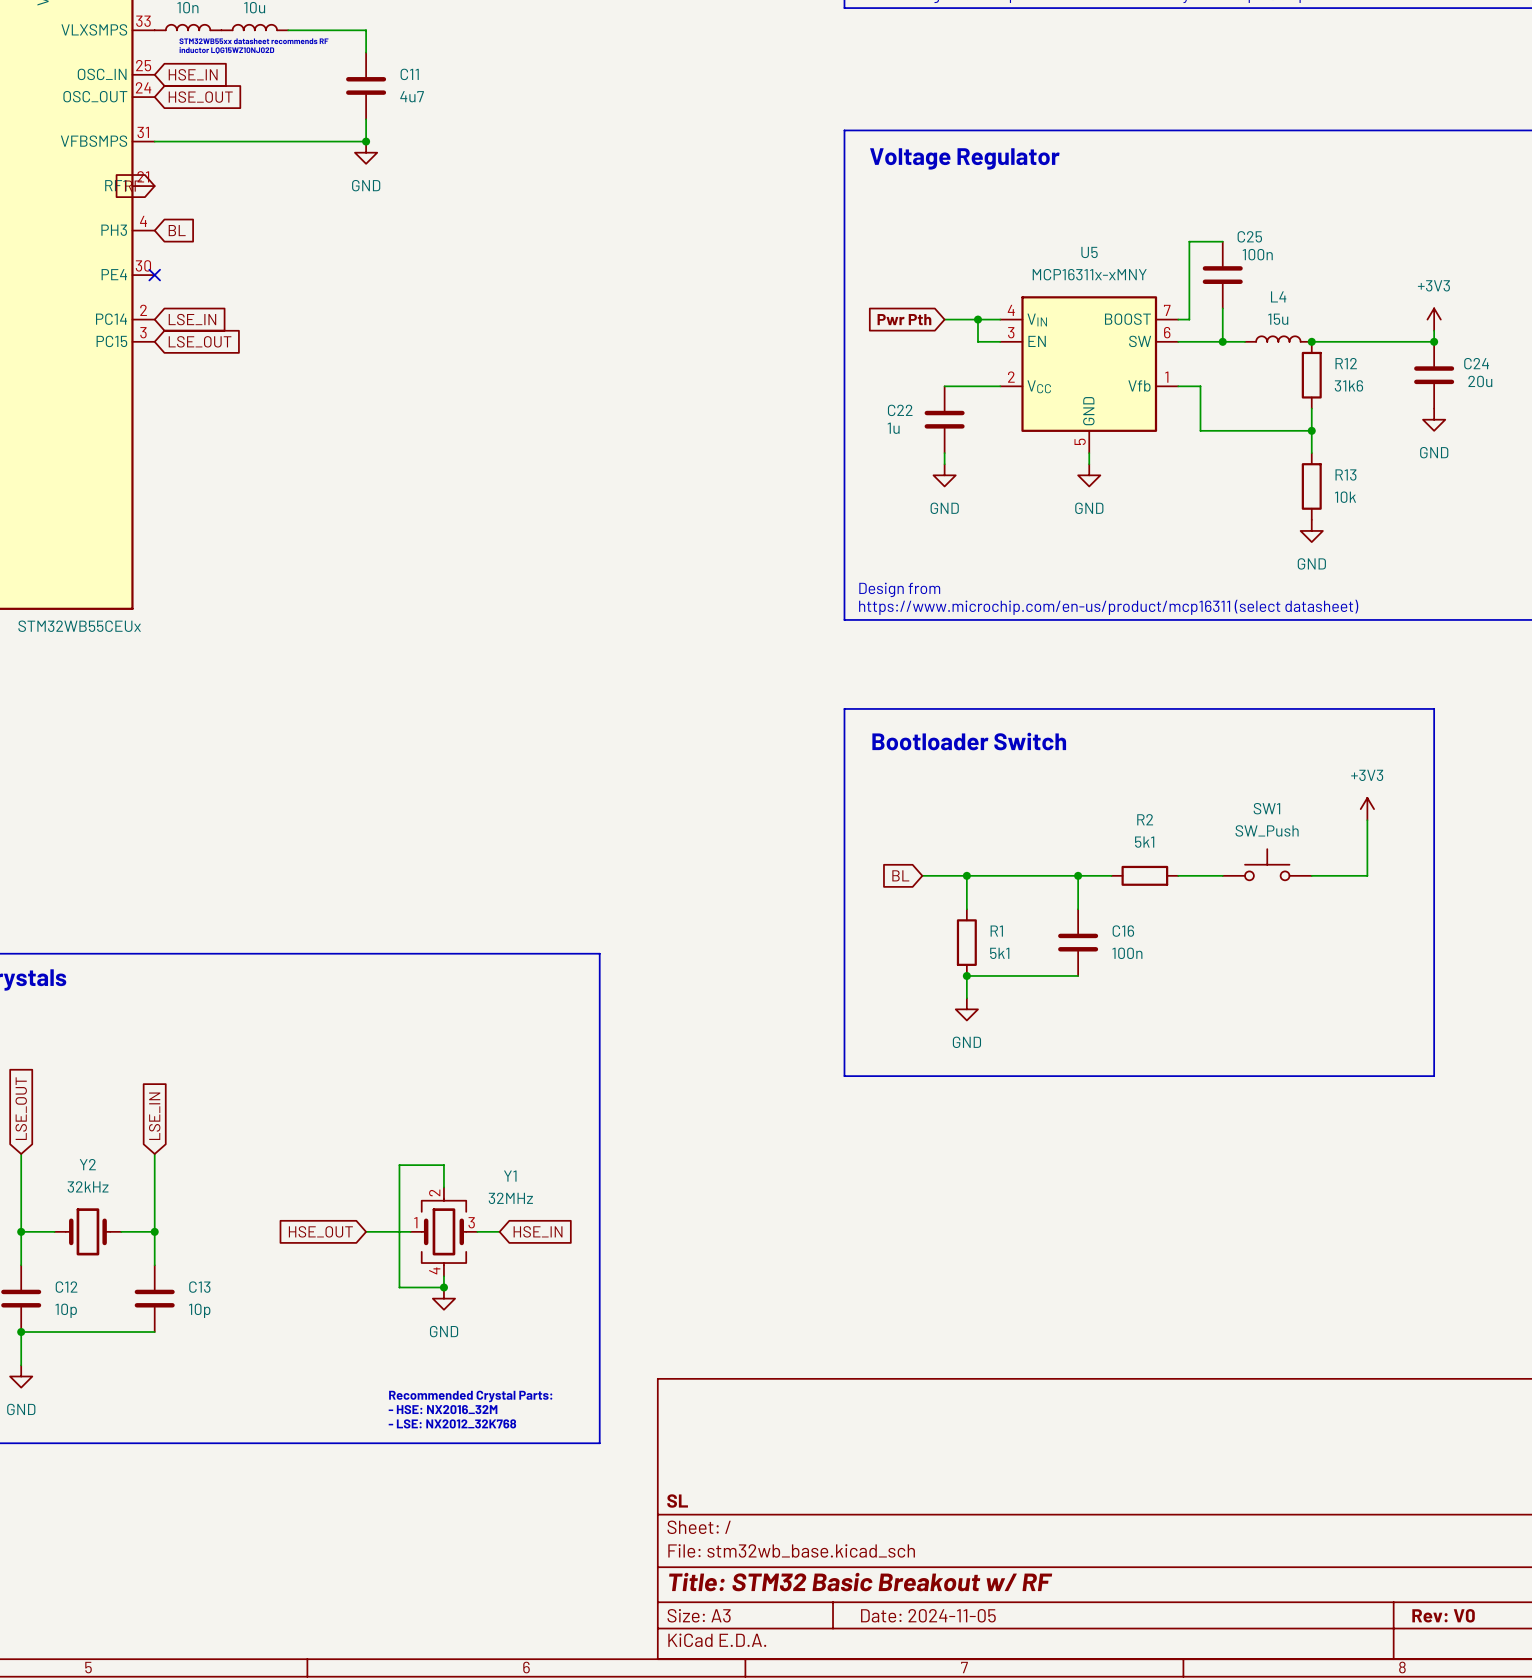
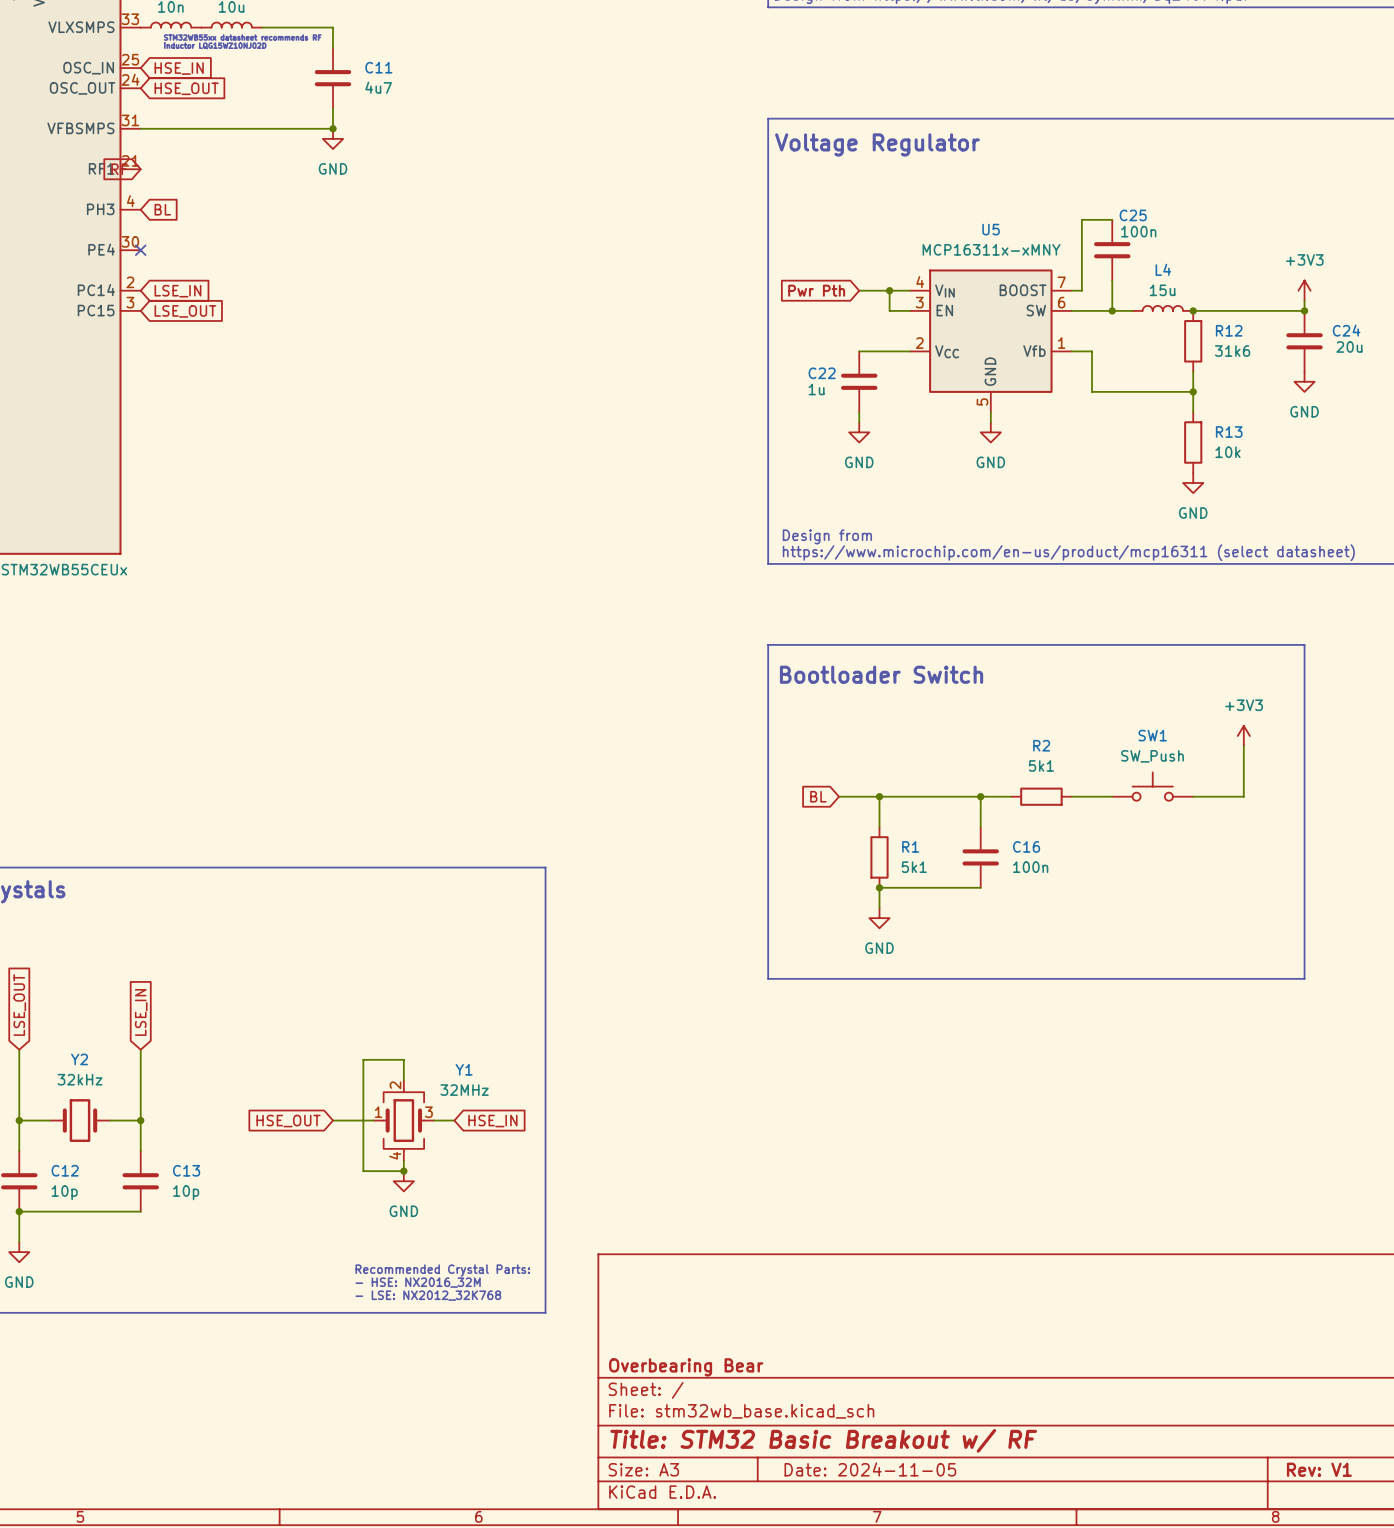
title block: SL (677, 1501) -> Overbearing Bear (686, 1367)
title block: Rev: V0 (1443, 1615) -> Rev: V1 (1319, 1469)

